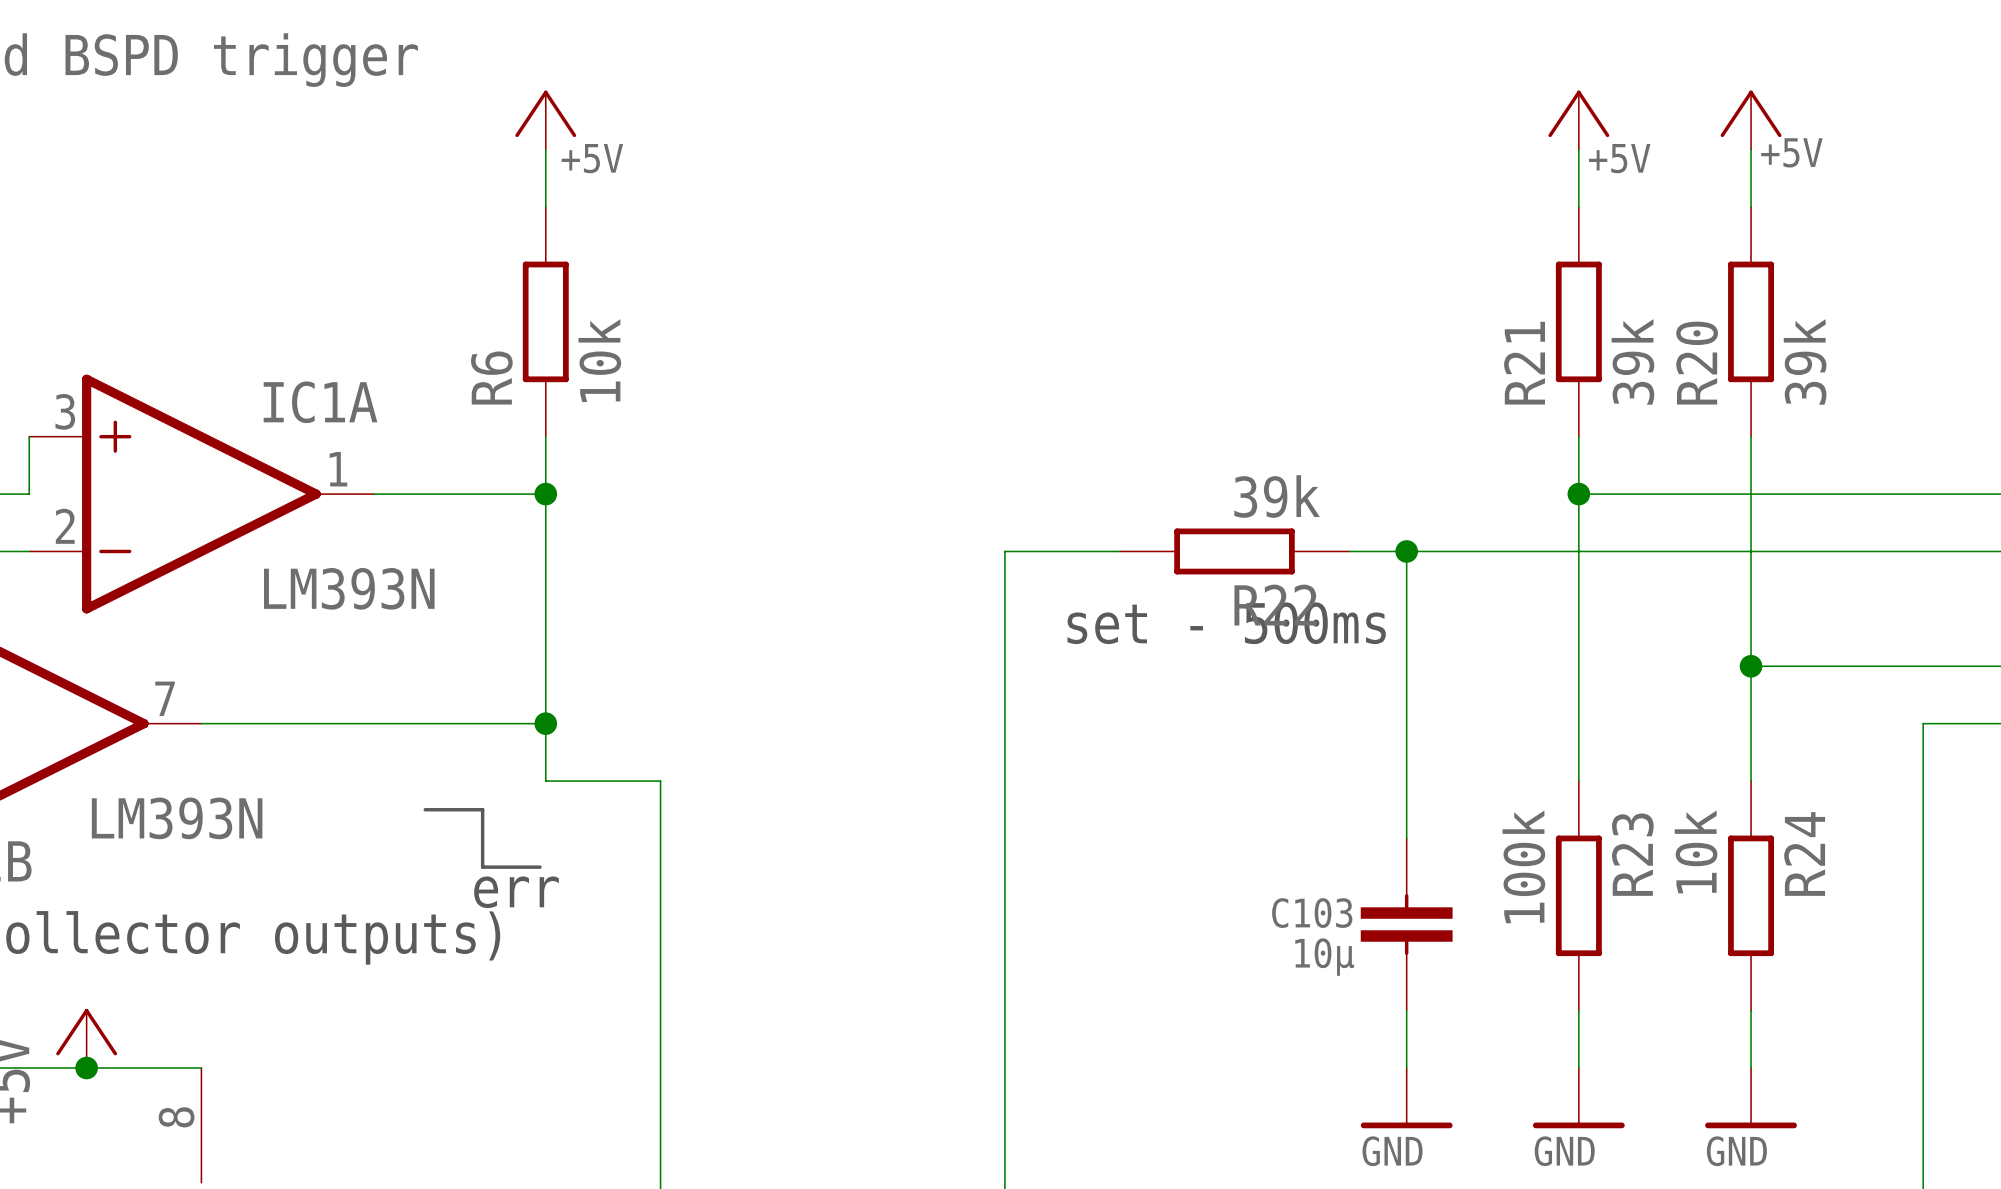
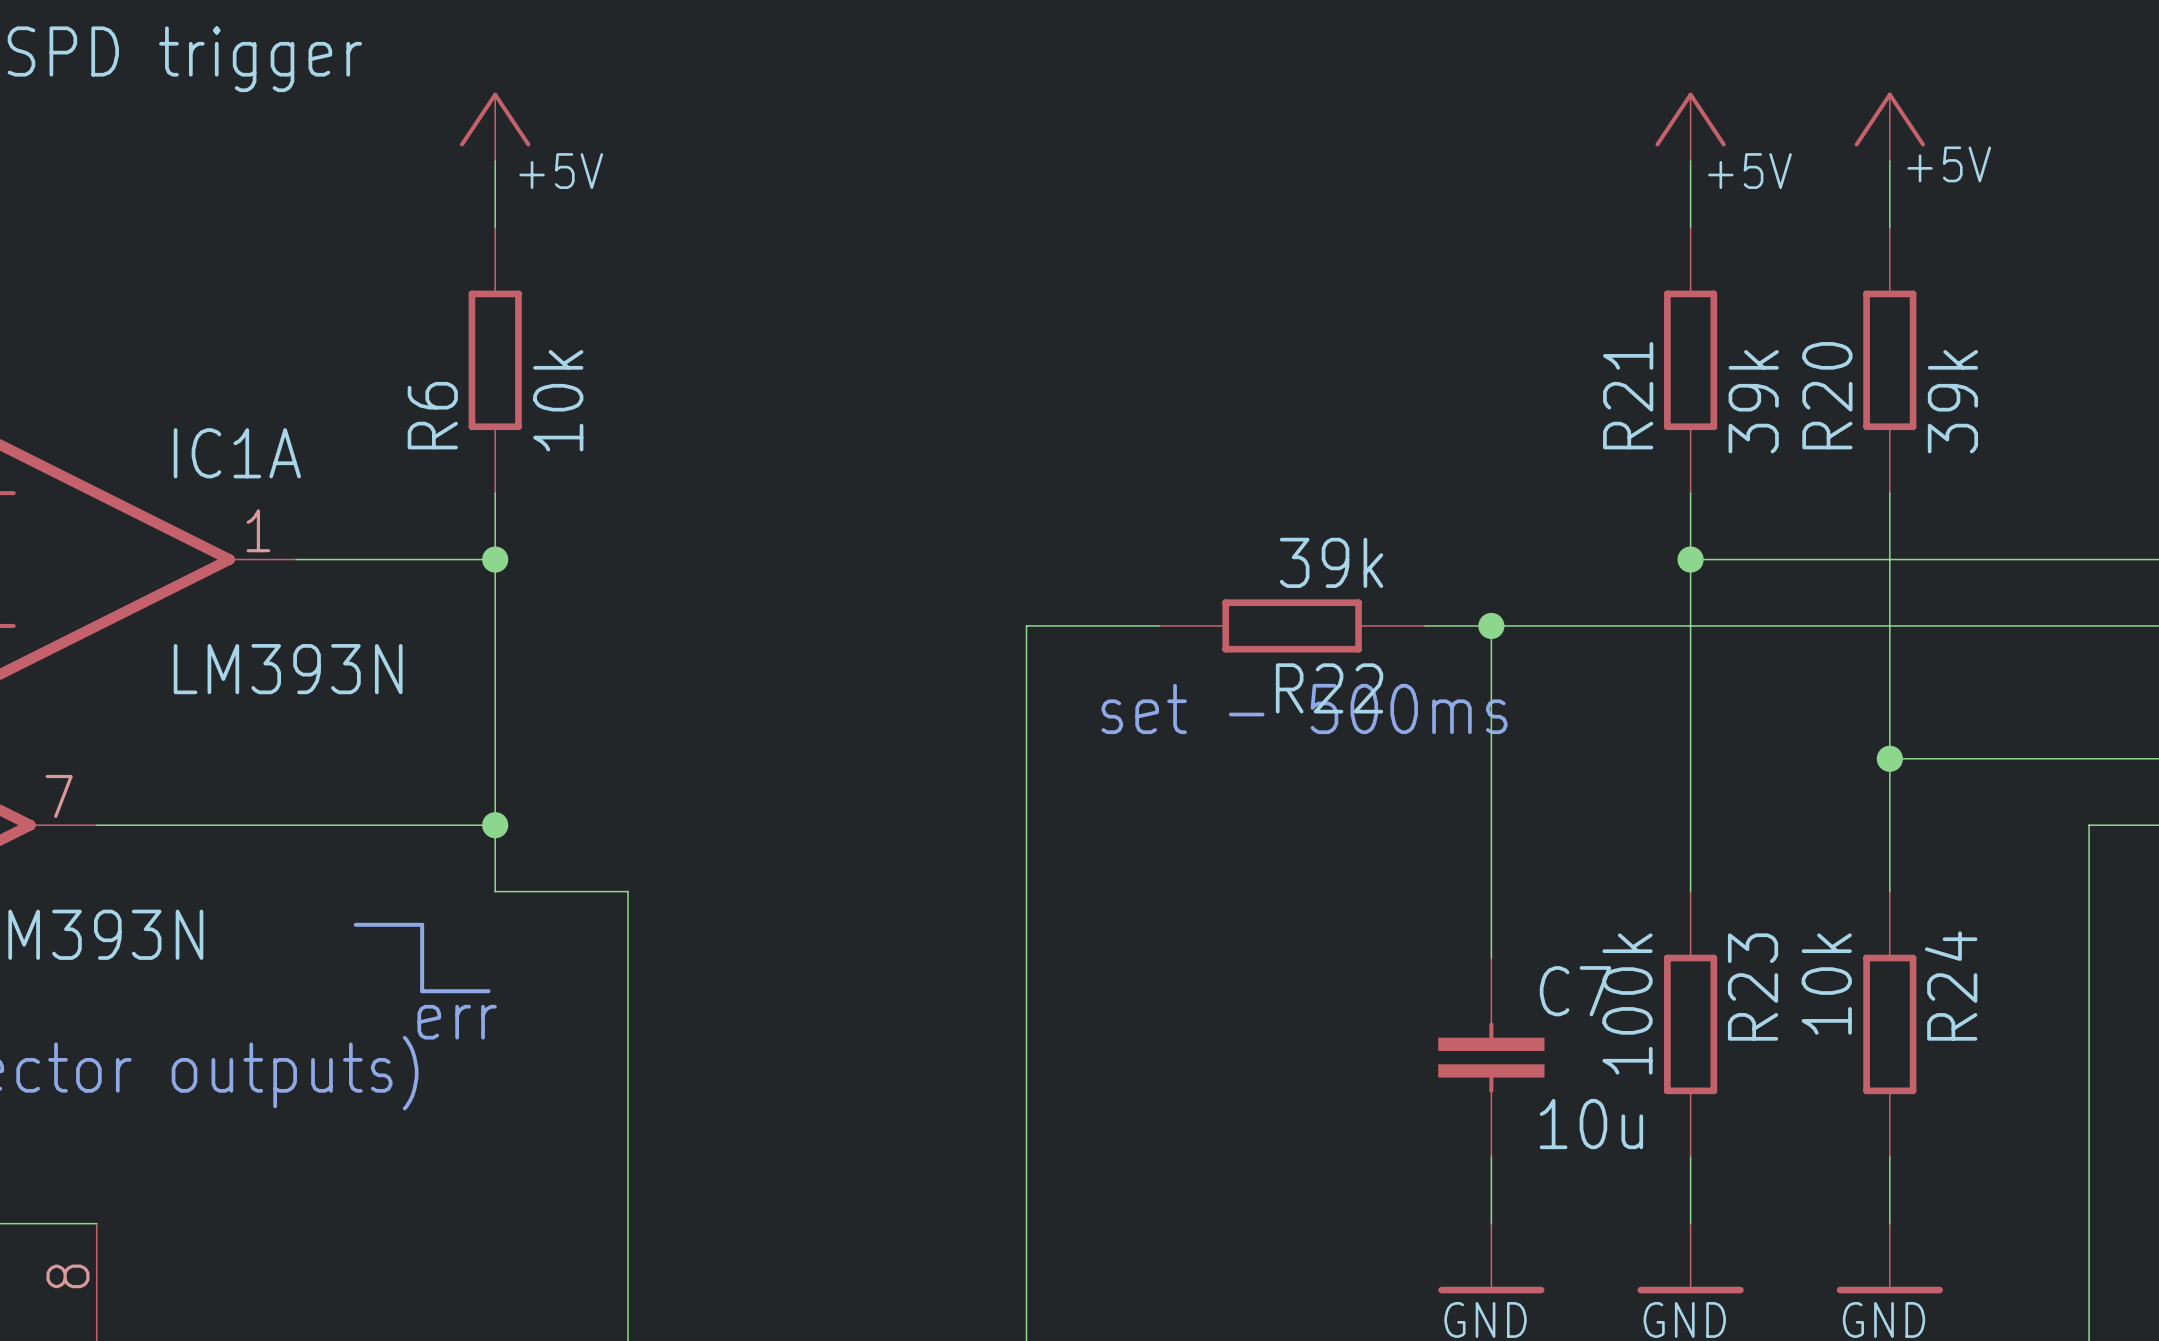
C103 name: C103 (1312, 913) -> C7 (1575, 991)
C103 value: 10µ (1324, 957) -> 10u (1591, 1124)

